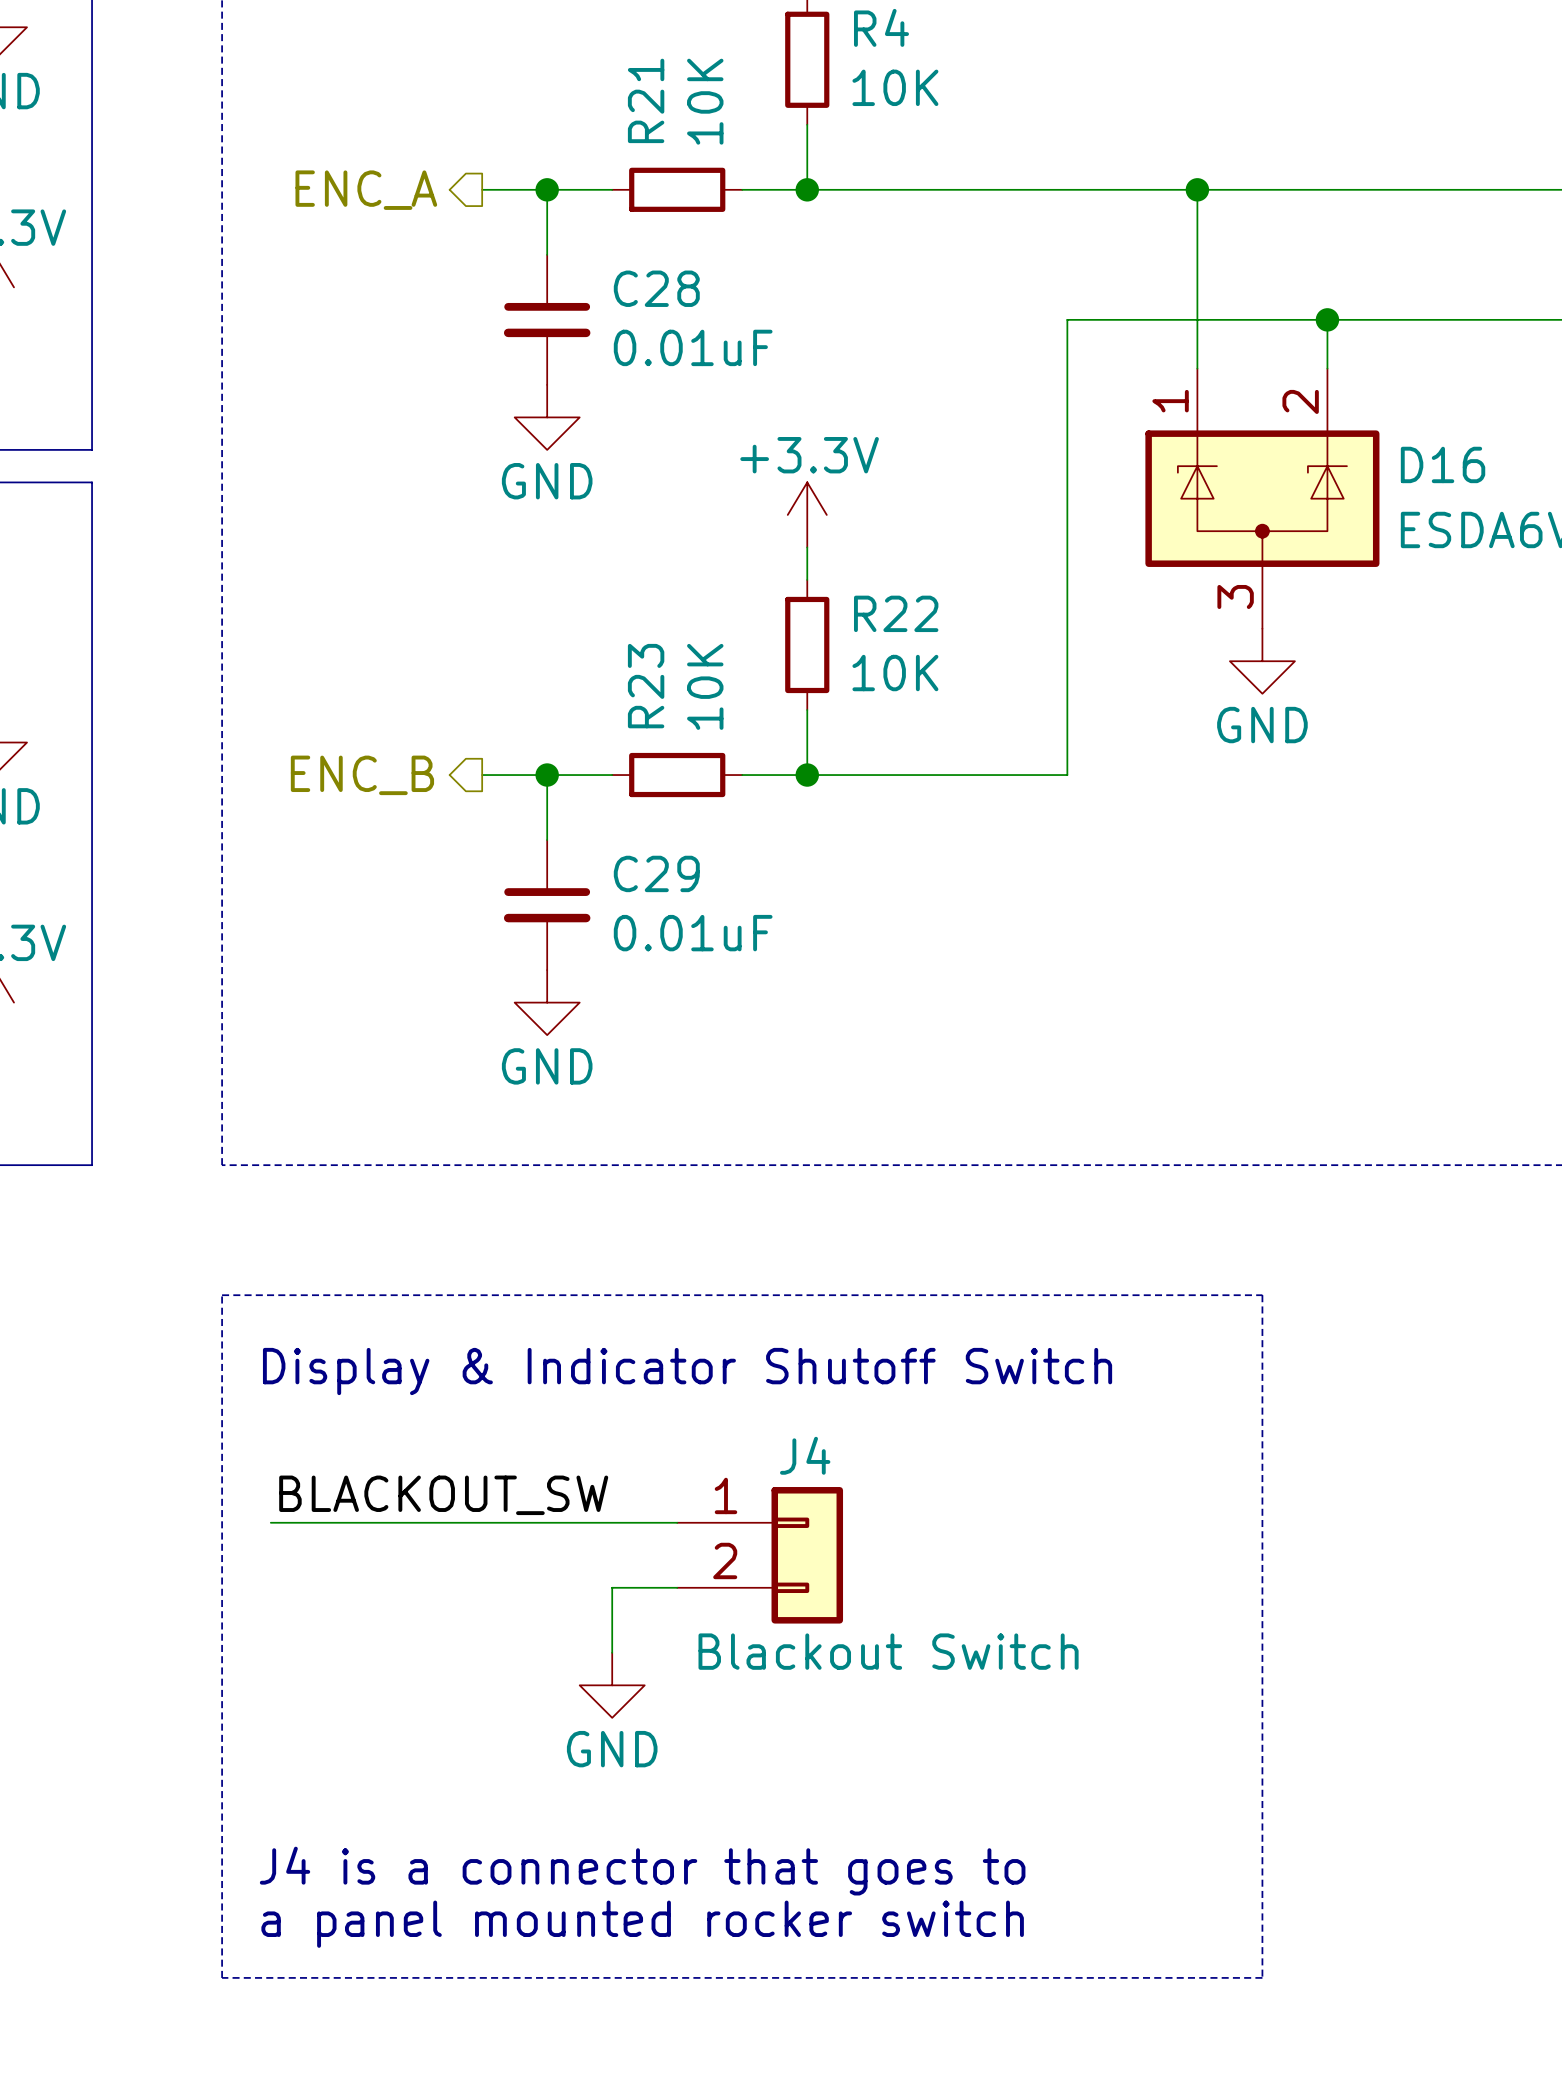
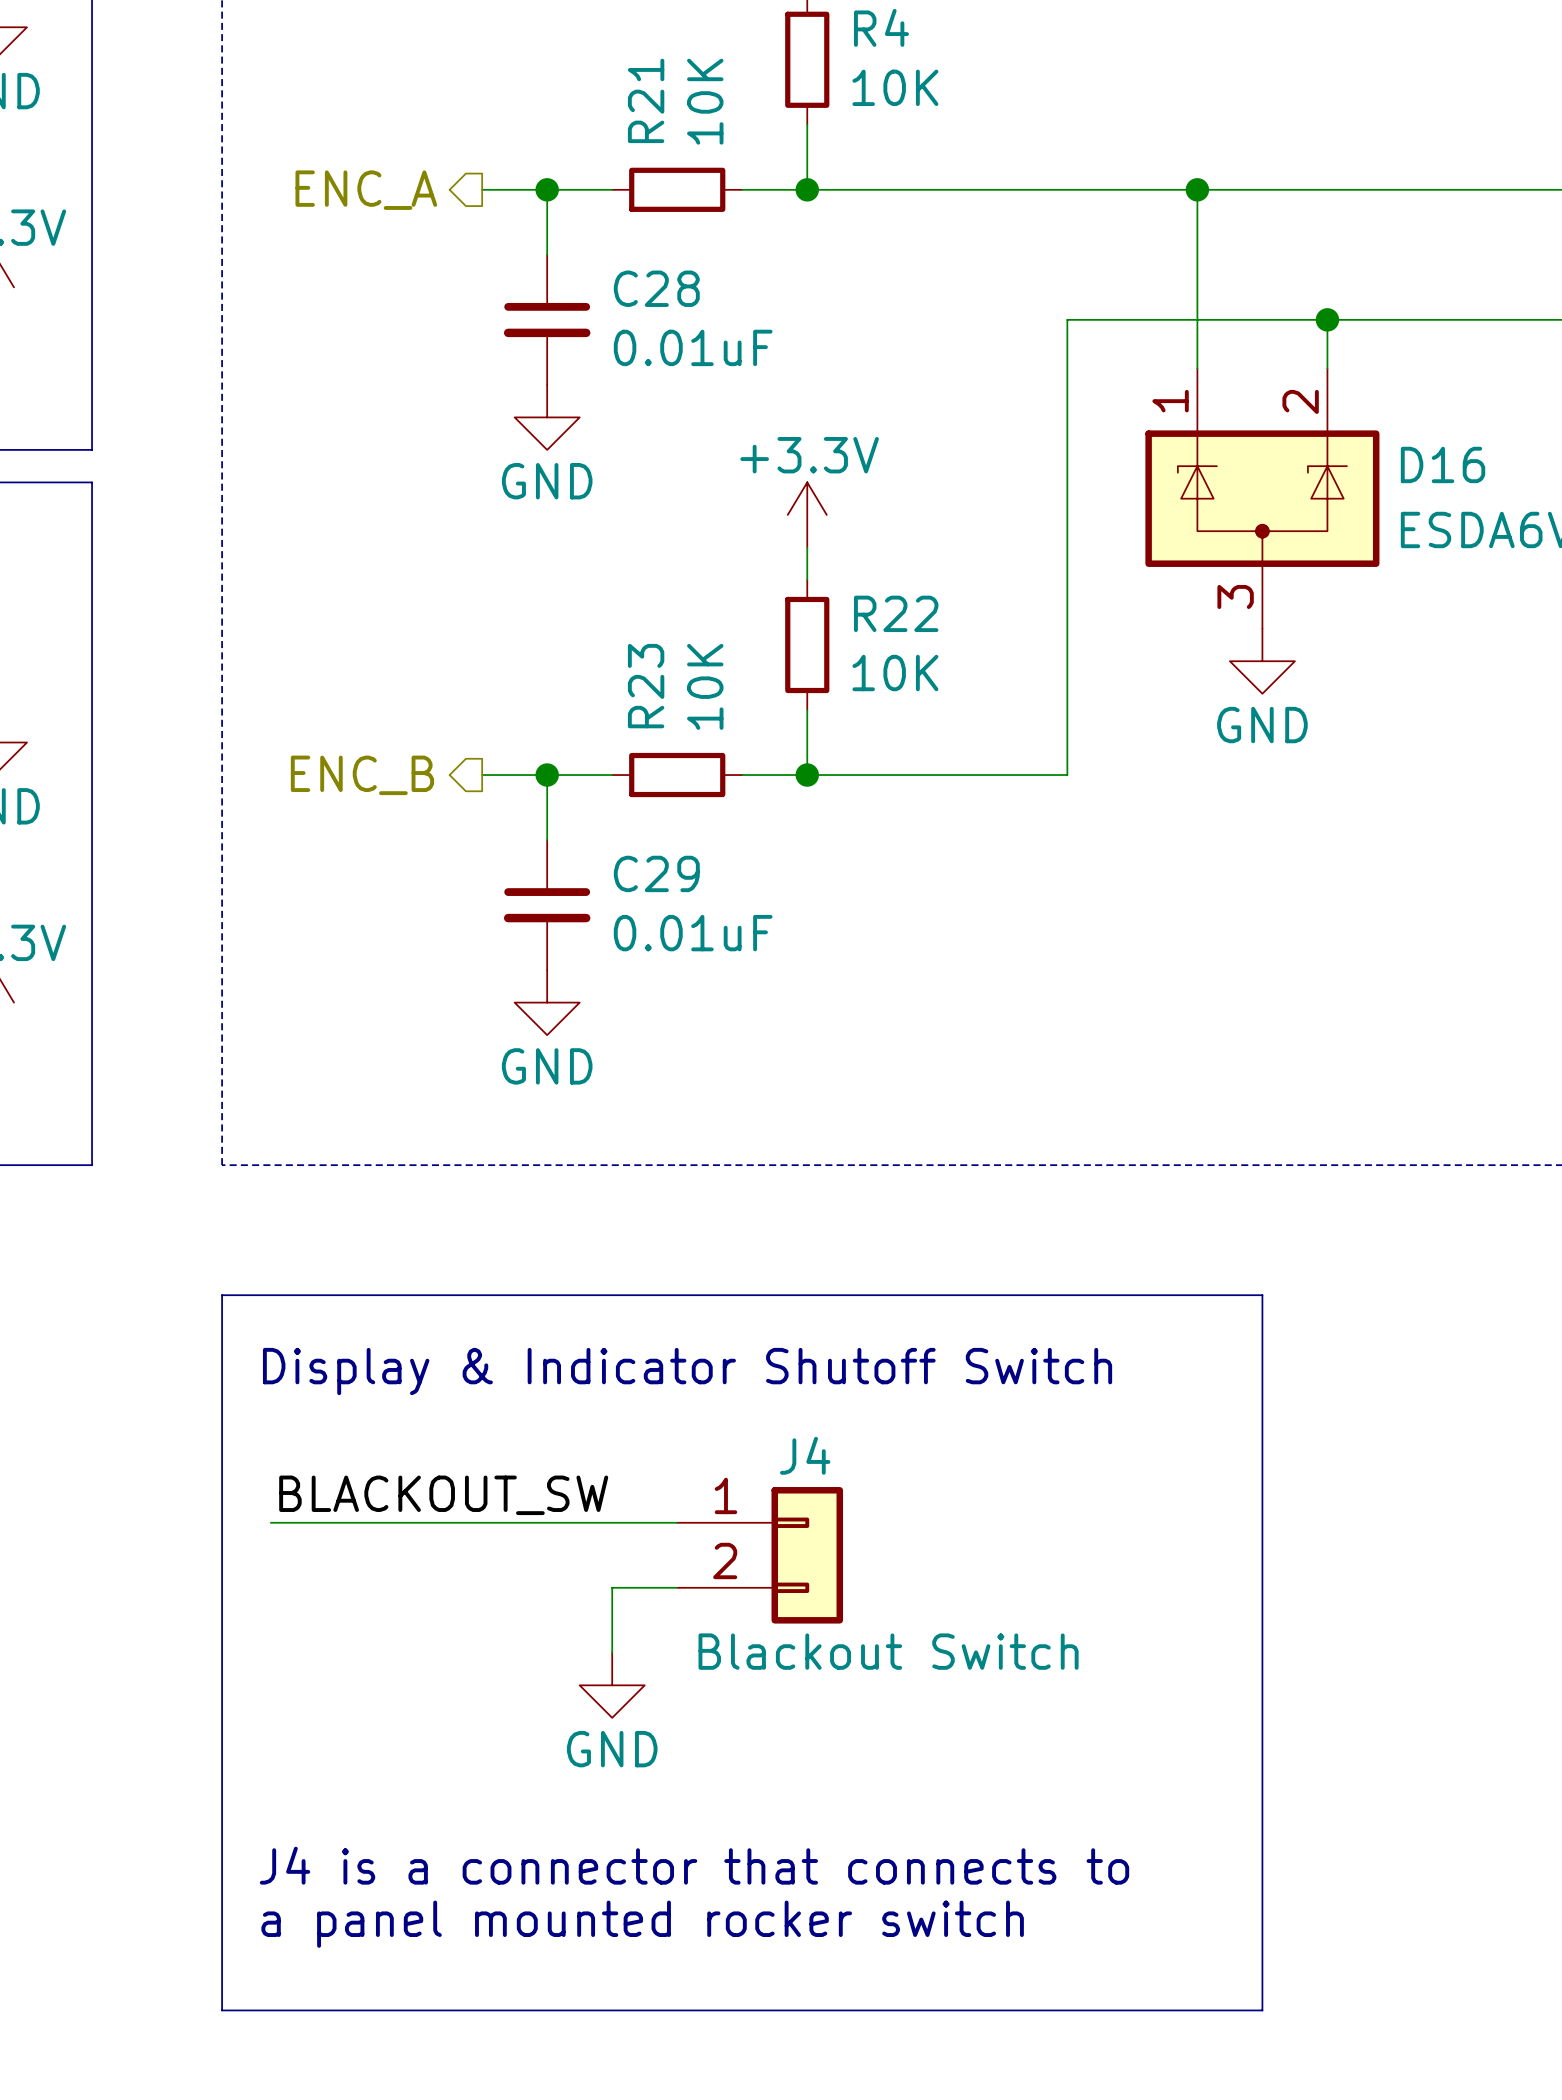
line: (222, 1295) (1262, 1295) (1262, 1977) (222, 1977) (222, 1295) -> (222, 1295) (222, 2010) (1262, 2010) (1262, 1295) (222, 1295)
text: J4 is a connector that goes to (642, 1871) -> J4 is a connector that connects to (694, 1865)

